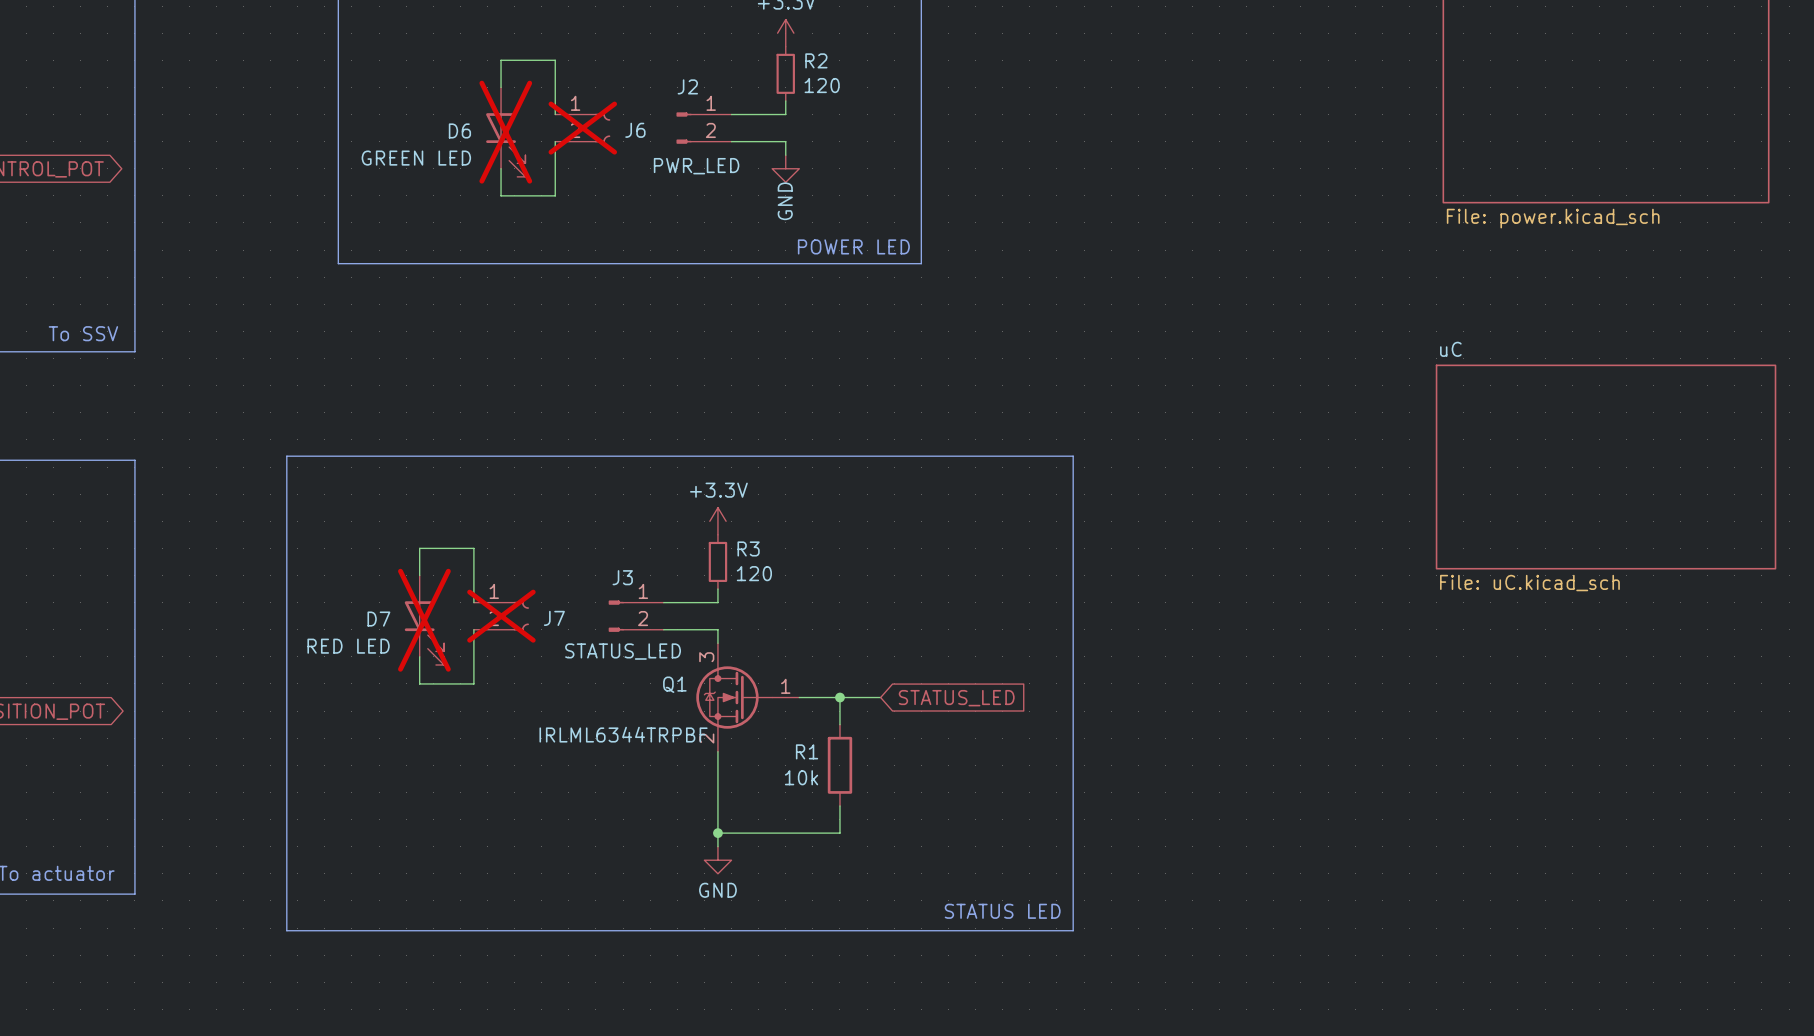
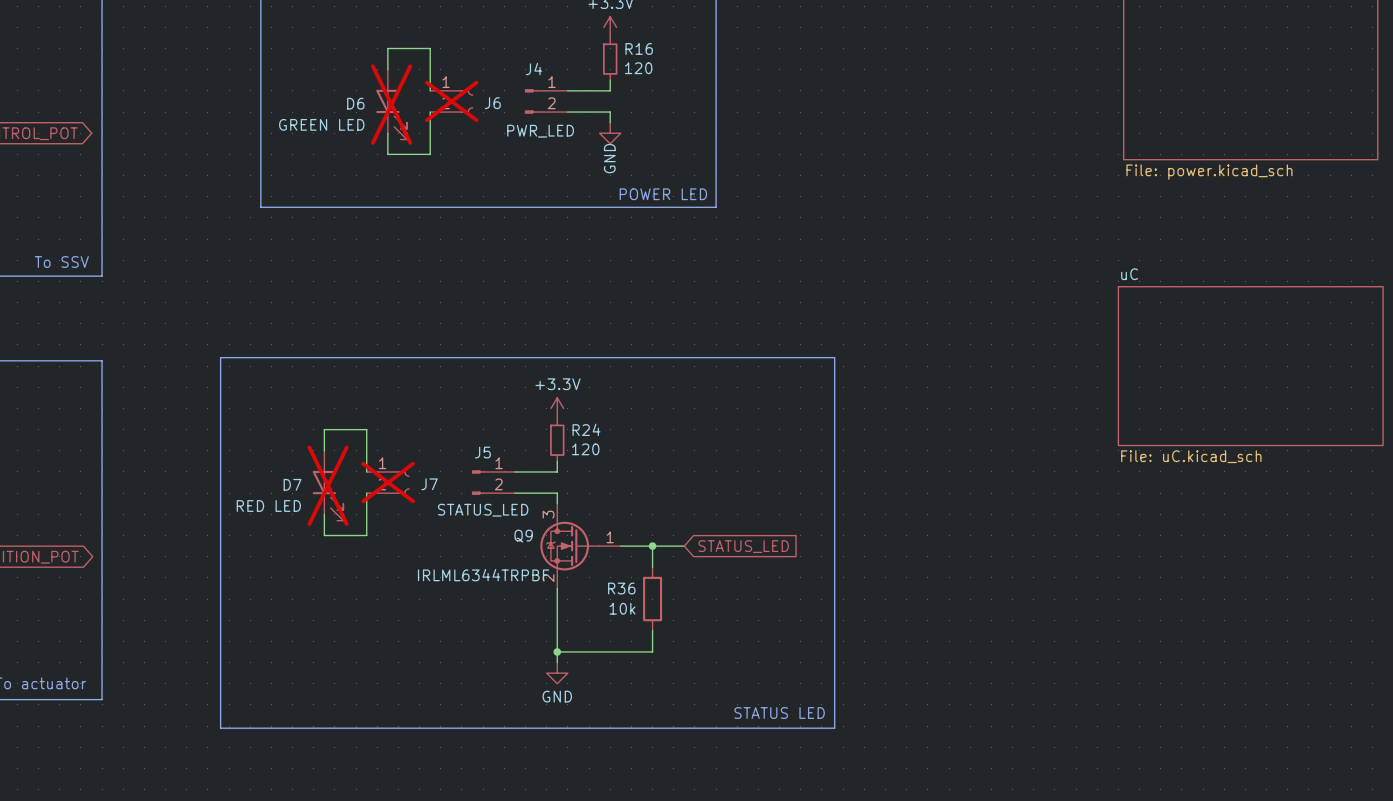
R2 name: R2 (816, 60) -> R16 (639, 48)
J2 name: J2 (687, 86) -> J4 (533, 69)
R3 name: R3 (748, 548) -> R24 (586, 429)
J3 name: J3 (622, 577) -> J5 (482, 452)
Q1 name: Q1 (674, 684) -> Q9 (523, 536)
R1 name: R1 (807, 751) -> R36 (621, 588)

